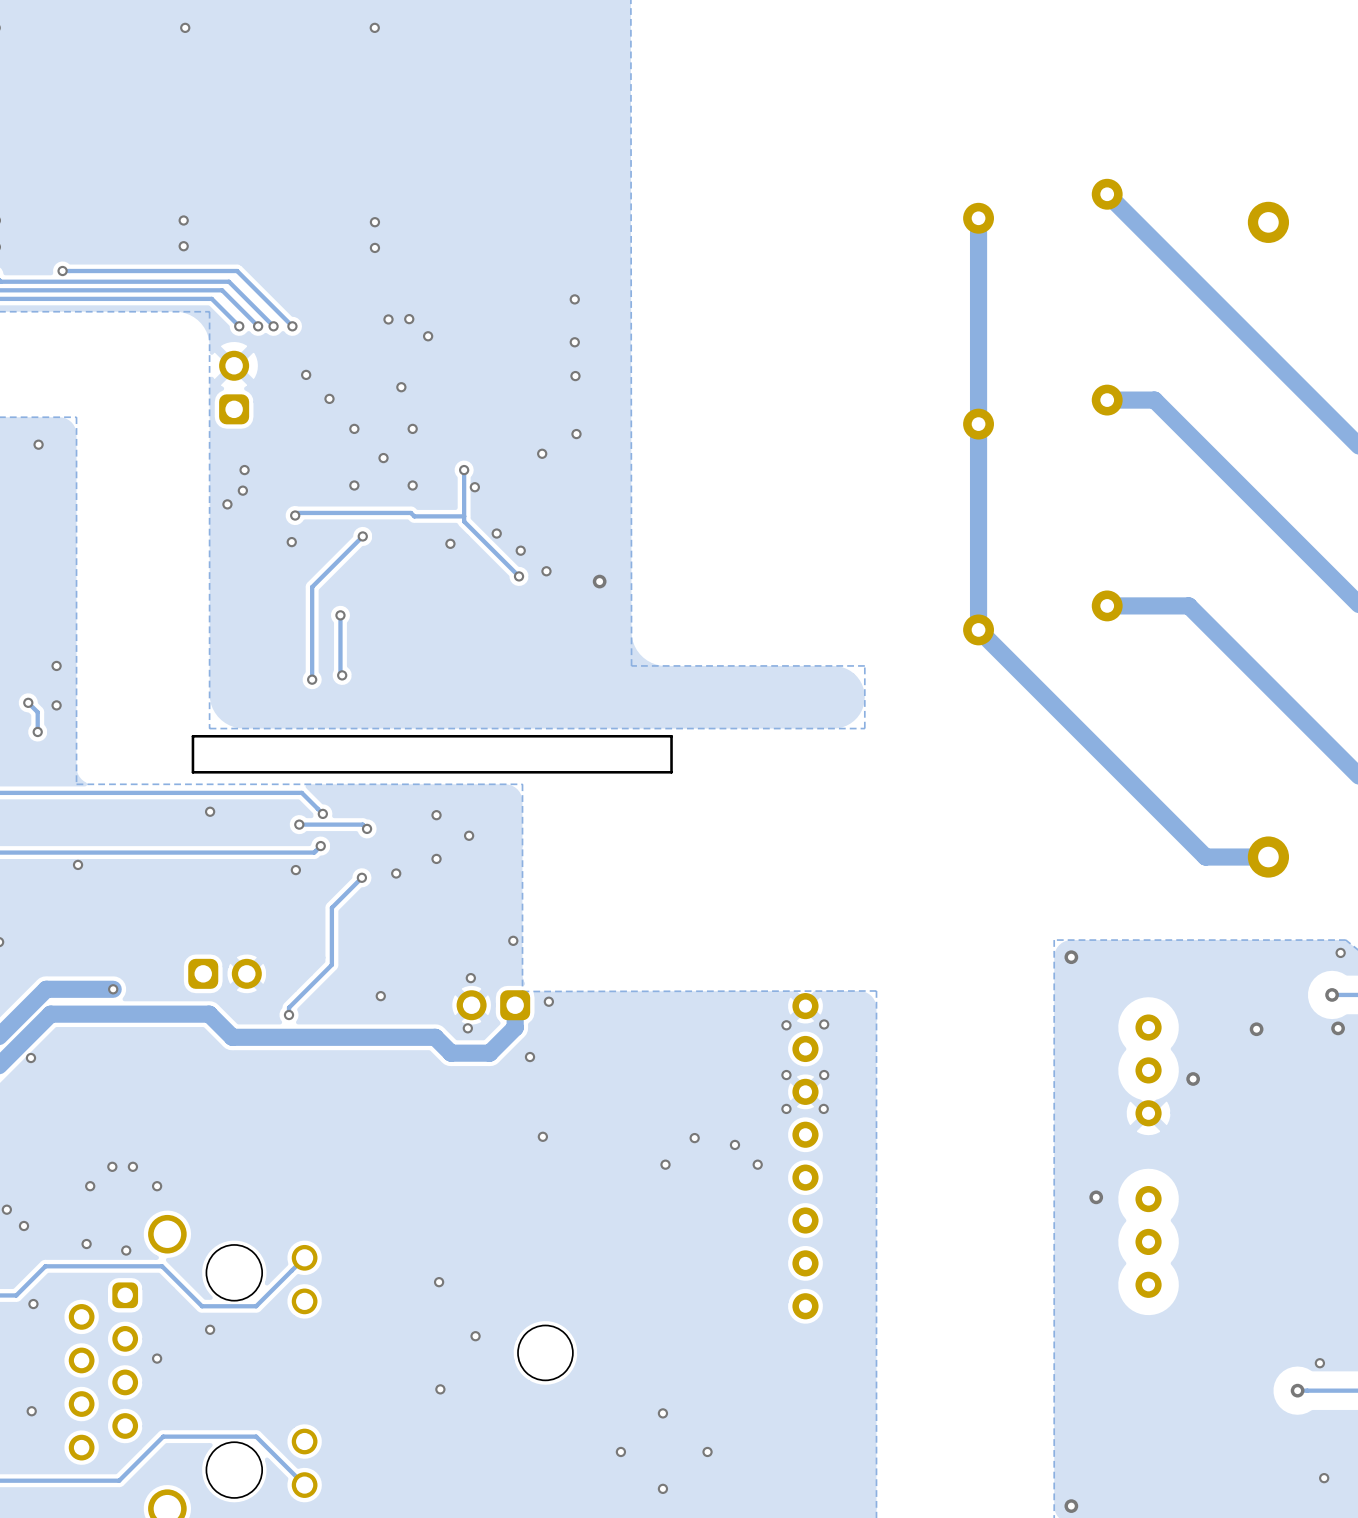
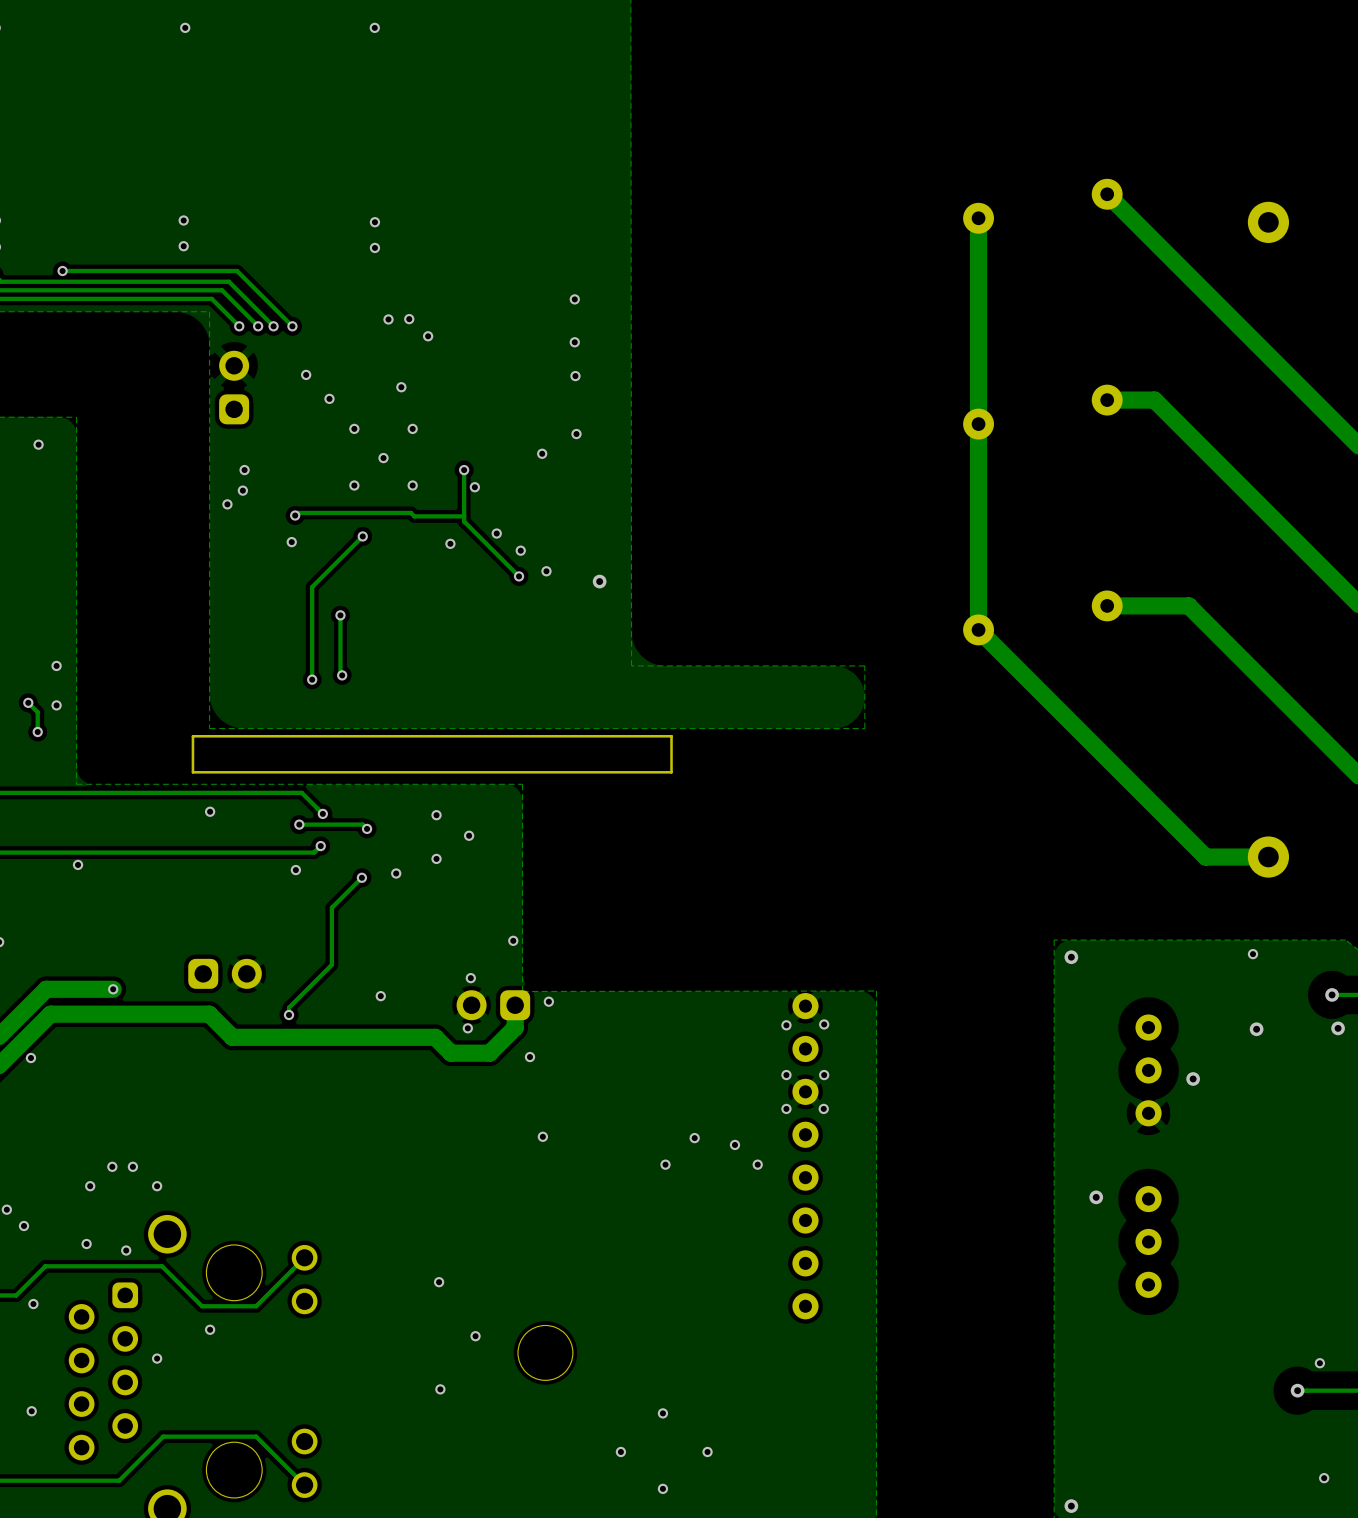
via: (1340, 952) -> none
via: none -> (1253, 954)

